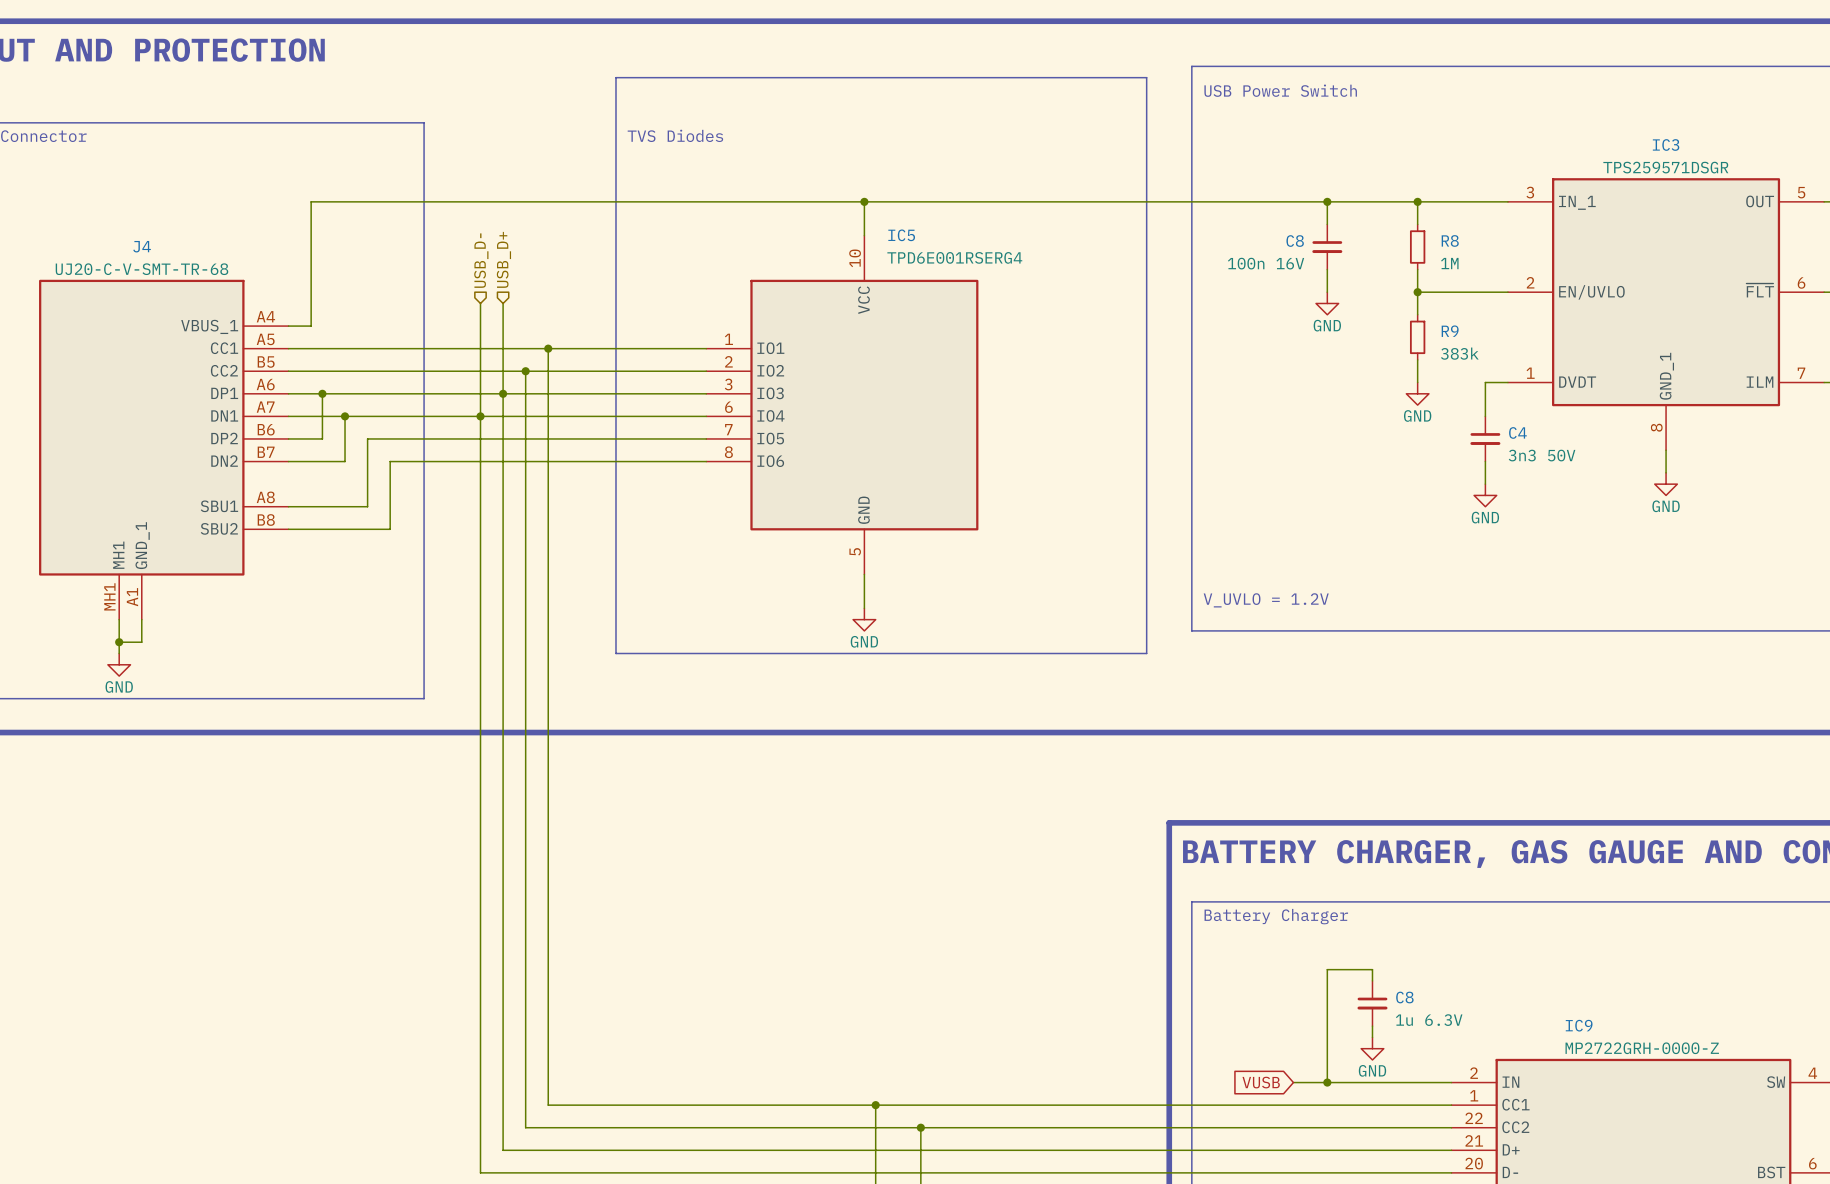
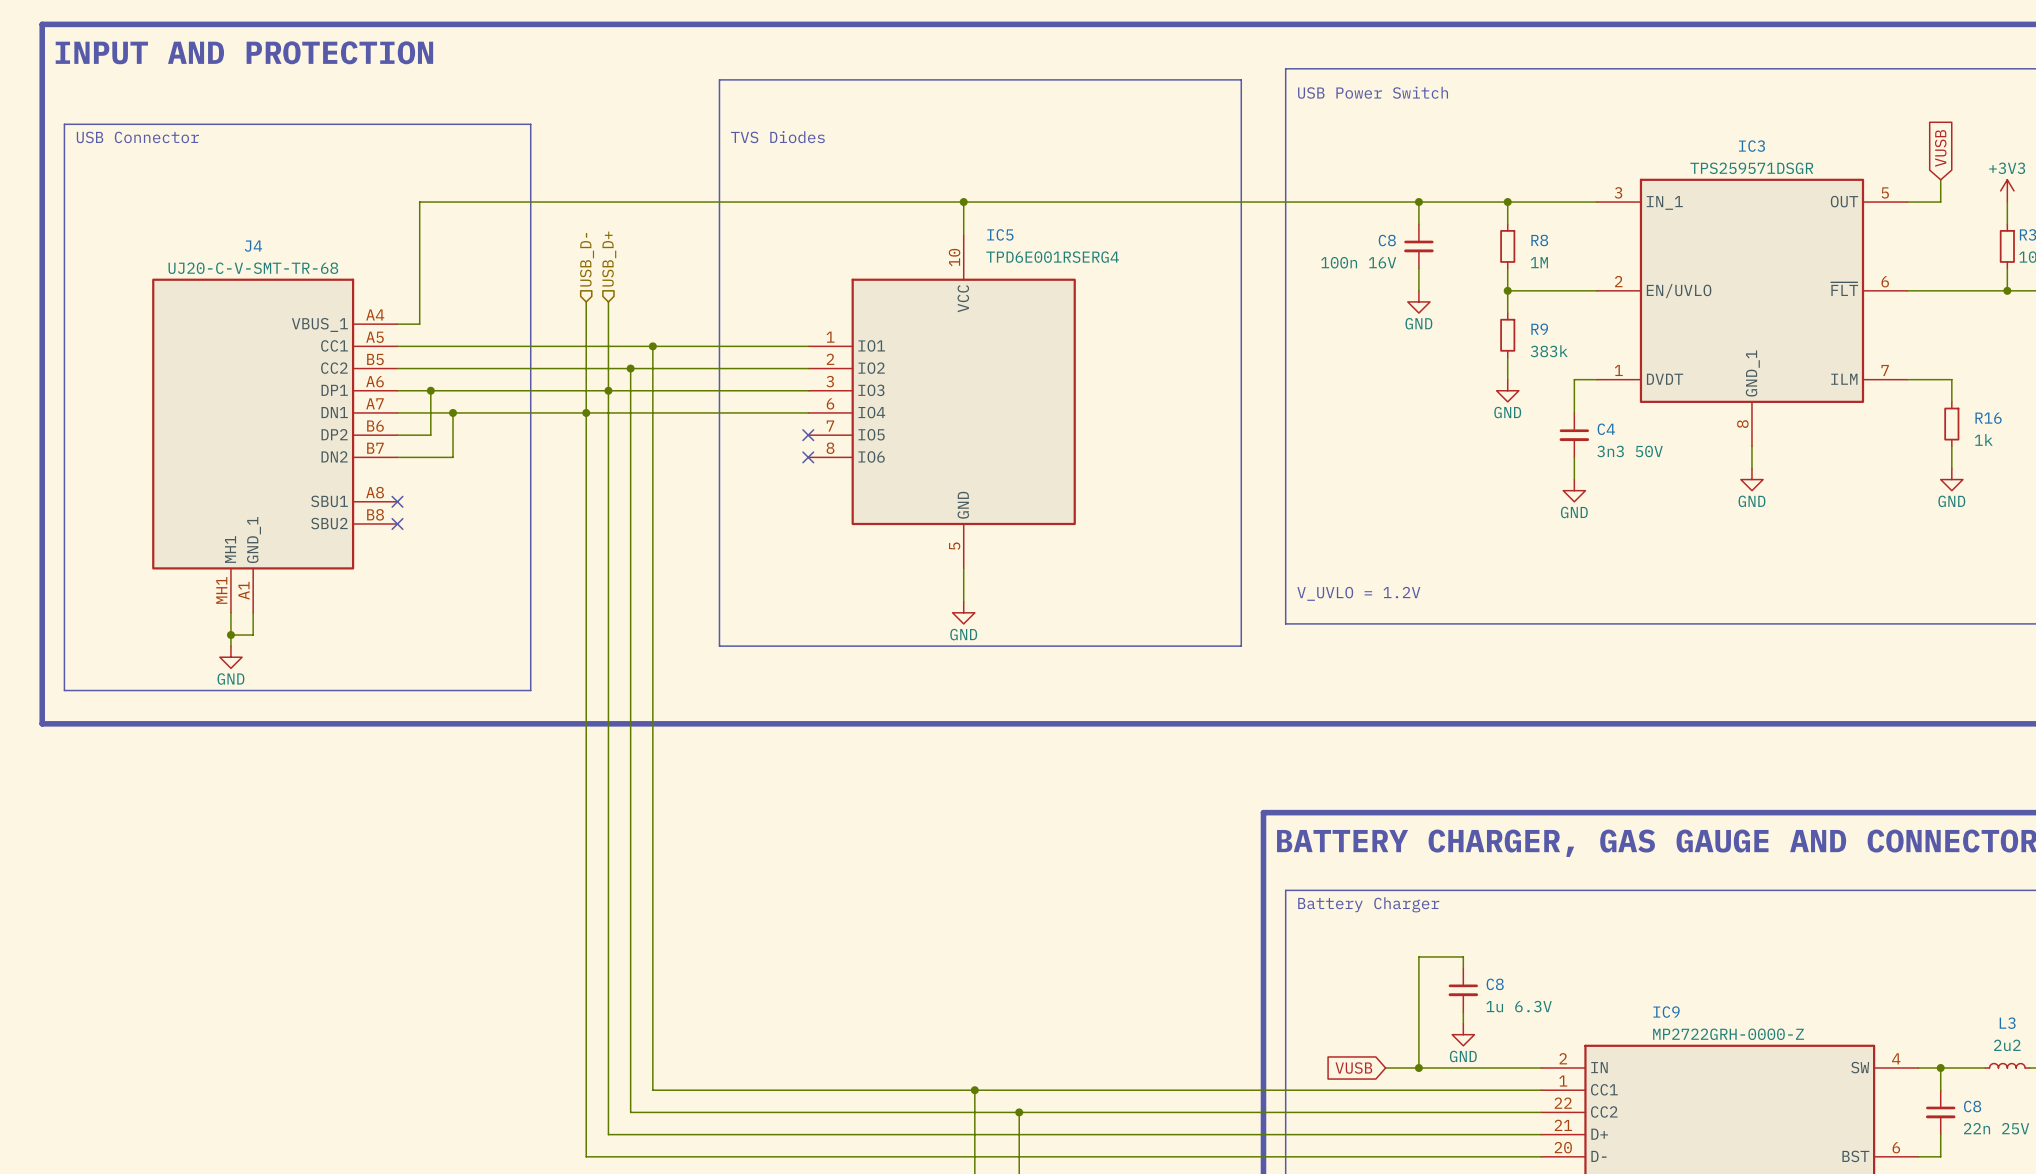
wire: (706, 438) (367, 438) (367, 506) (288, 506) -> none
no-connect mark: none -> (808, 435)
wire: (706, 461) (390, 461) (390, 529) (288, 529) -> none
no-connect mark: none -> (808, 457)
no-connect mark: none -> (397, 501)
no-connect mark: none -> (397, 523)

